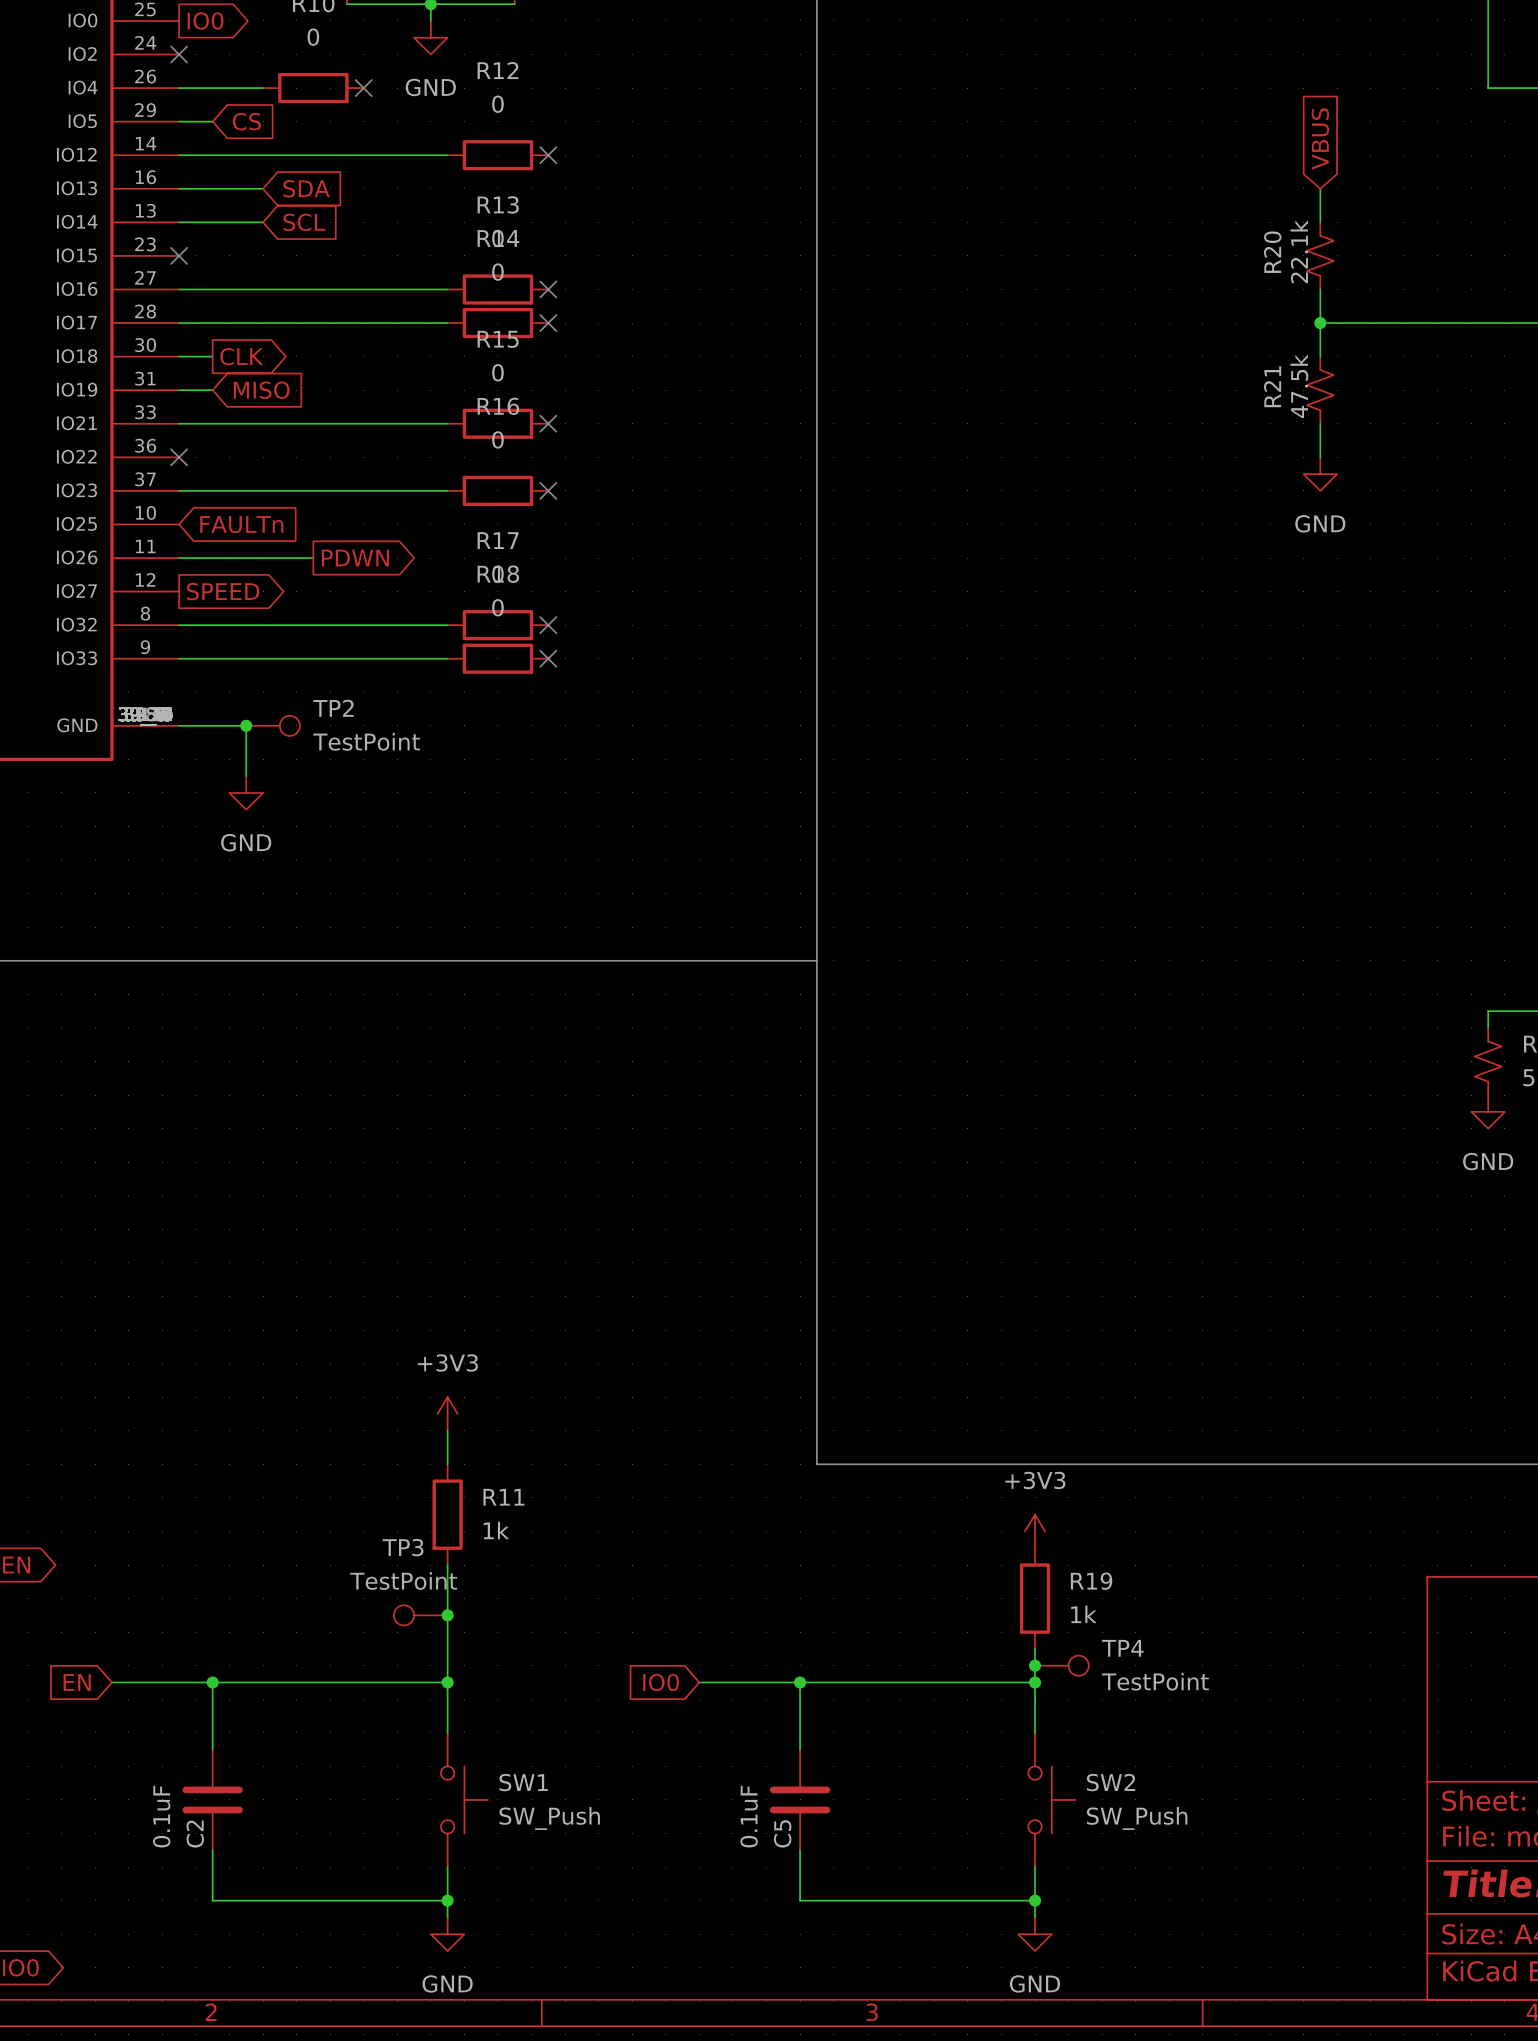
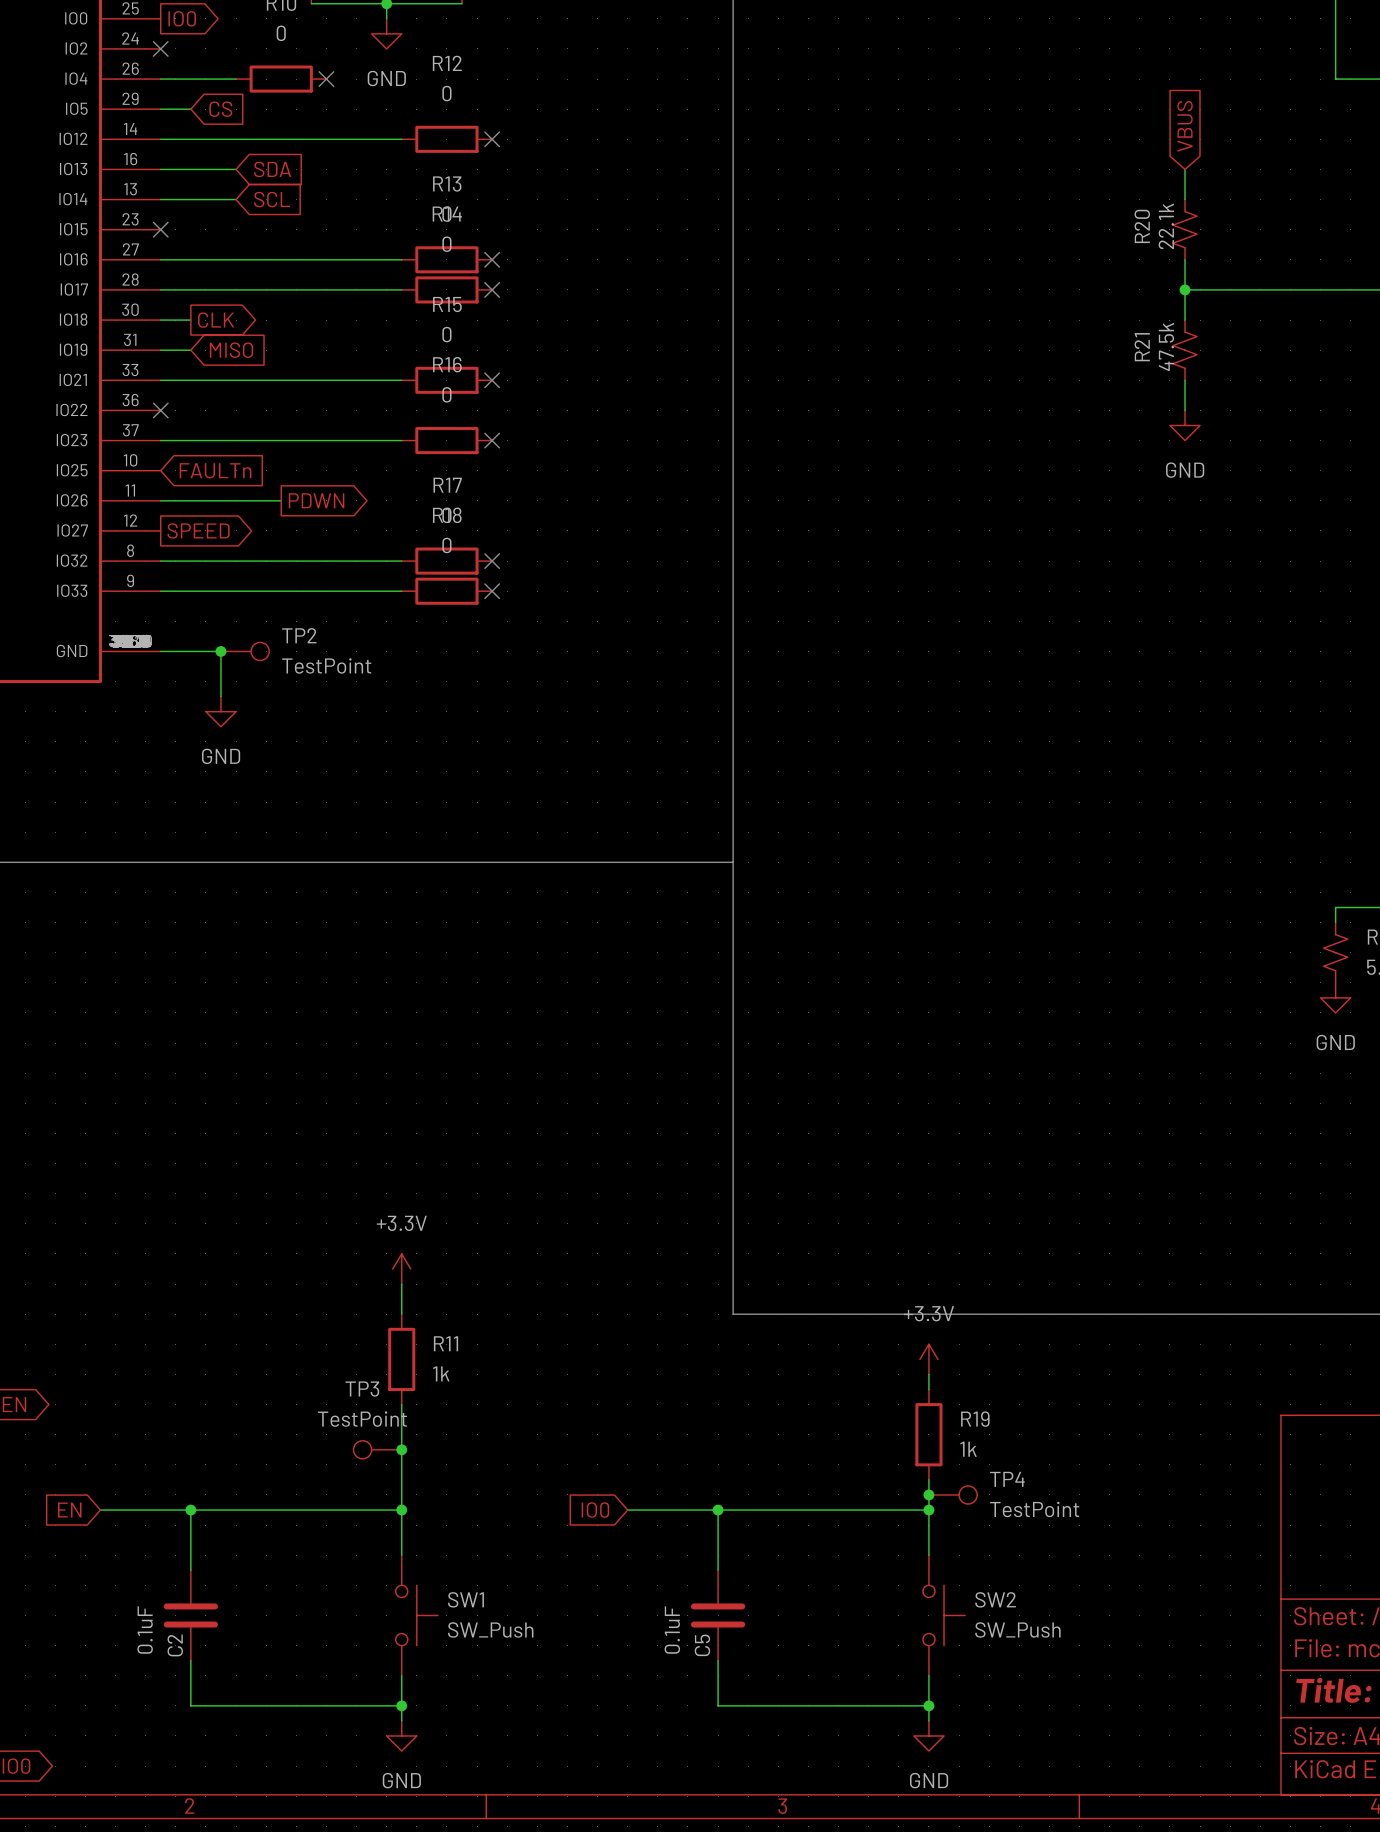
power symbol: +3V3 (447, 1413) -> +3.3V (401, 1269)
power symbol: none -> +3.3V (928, 1359)
power symbol: +3V3 (1035, 1531) -> none

